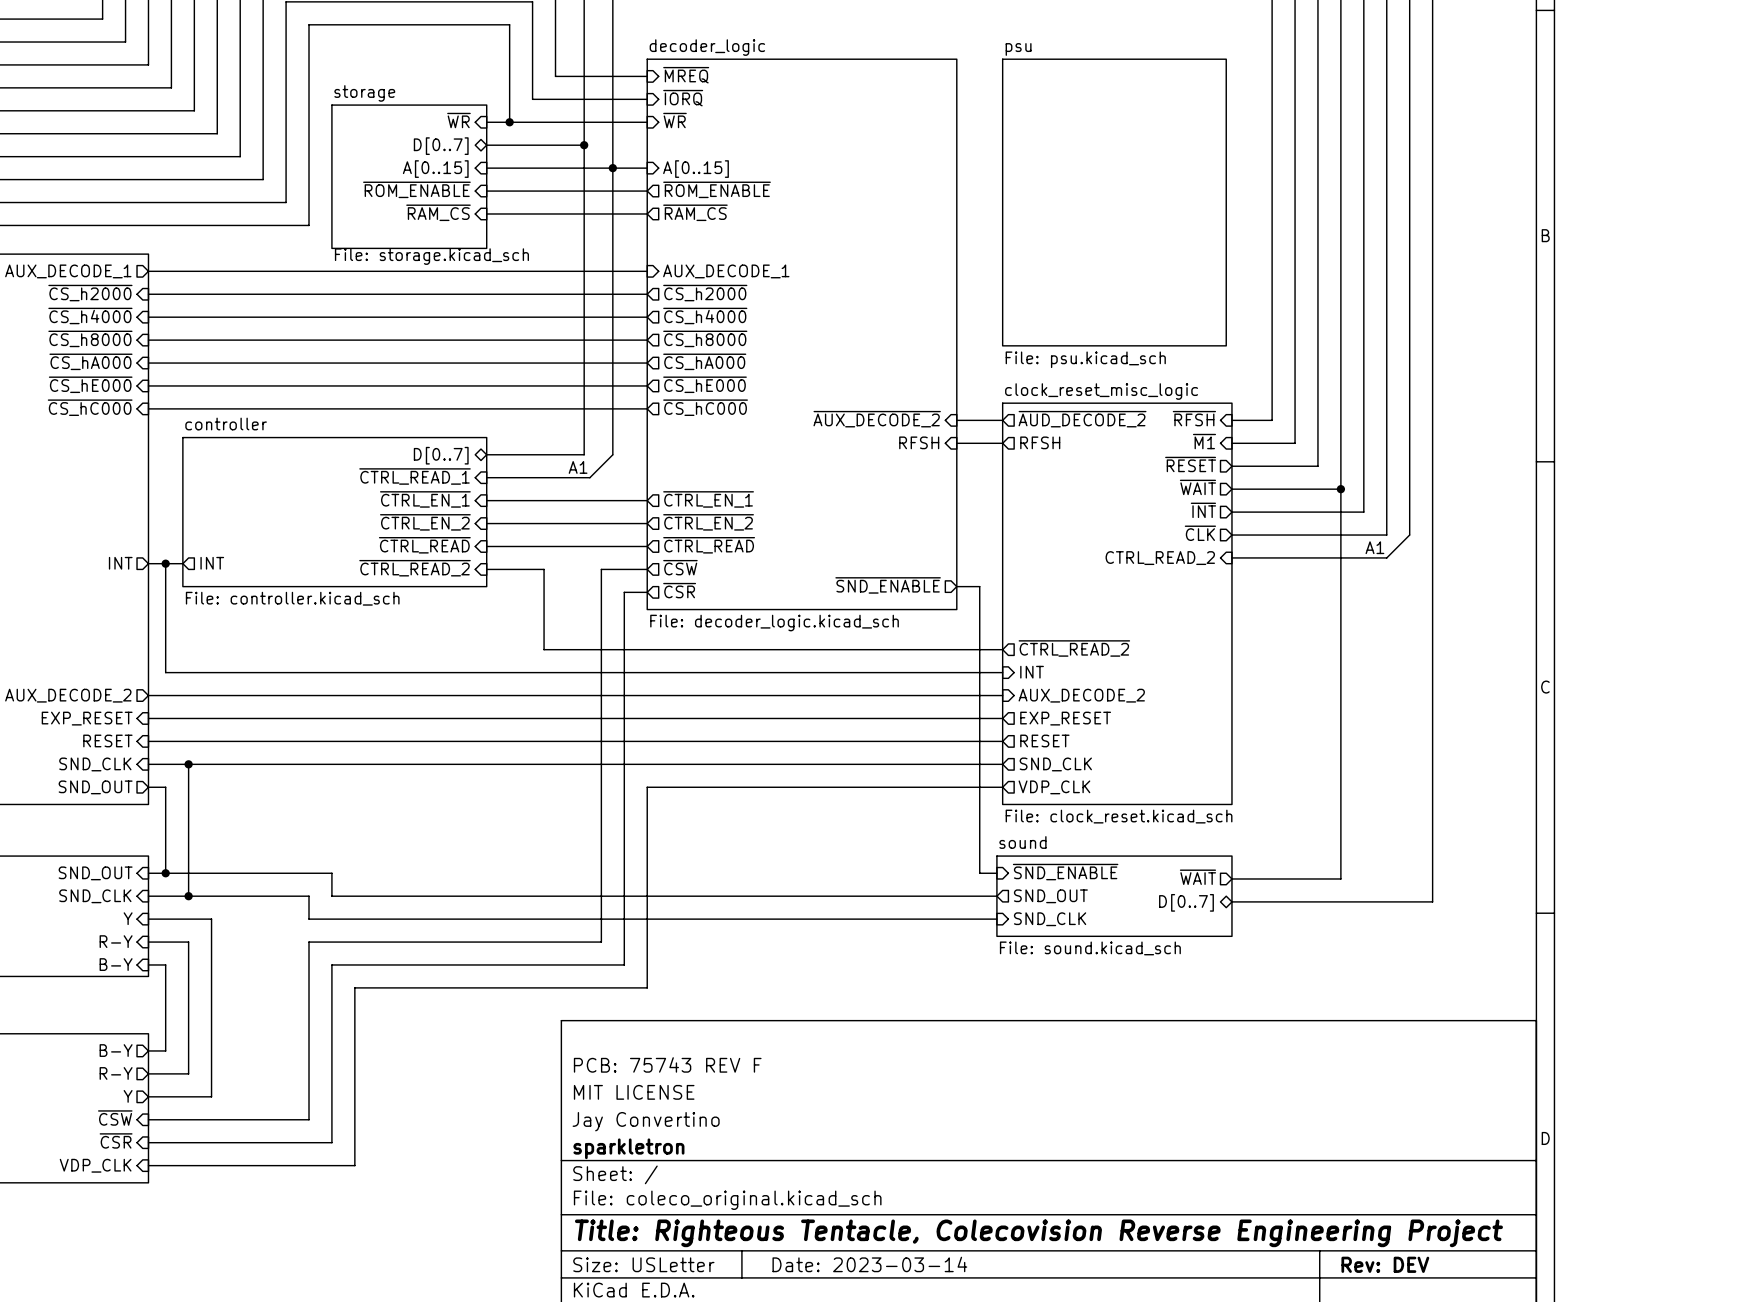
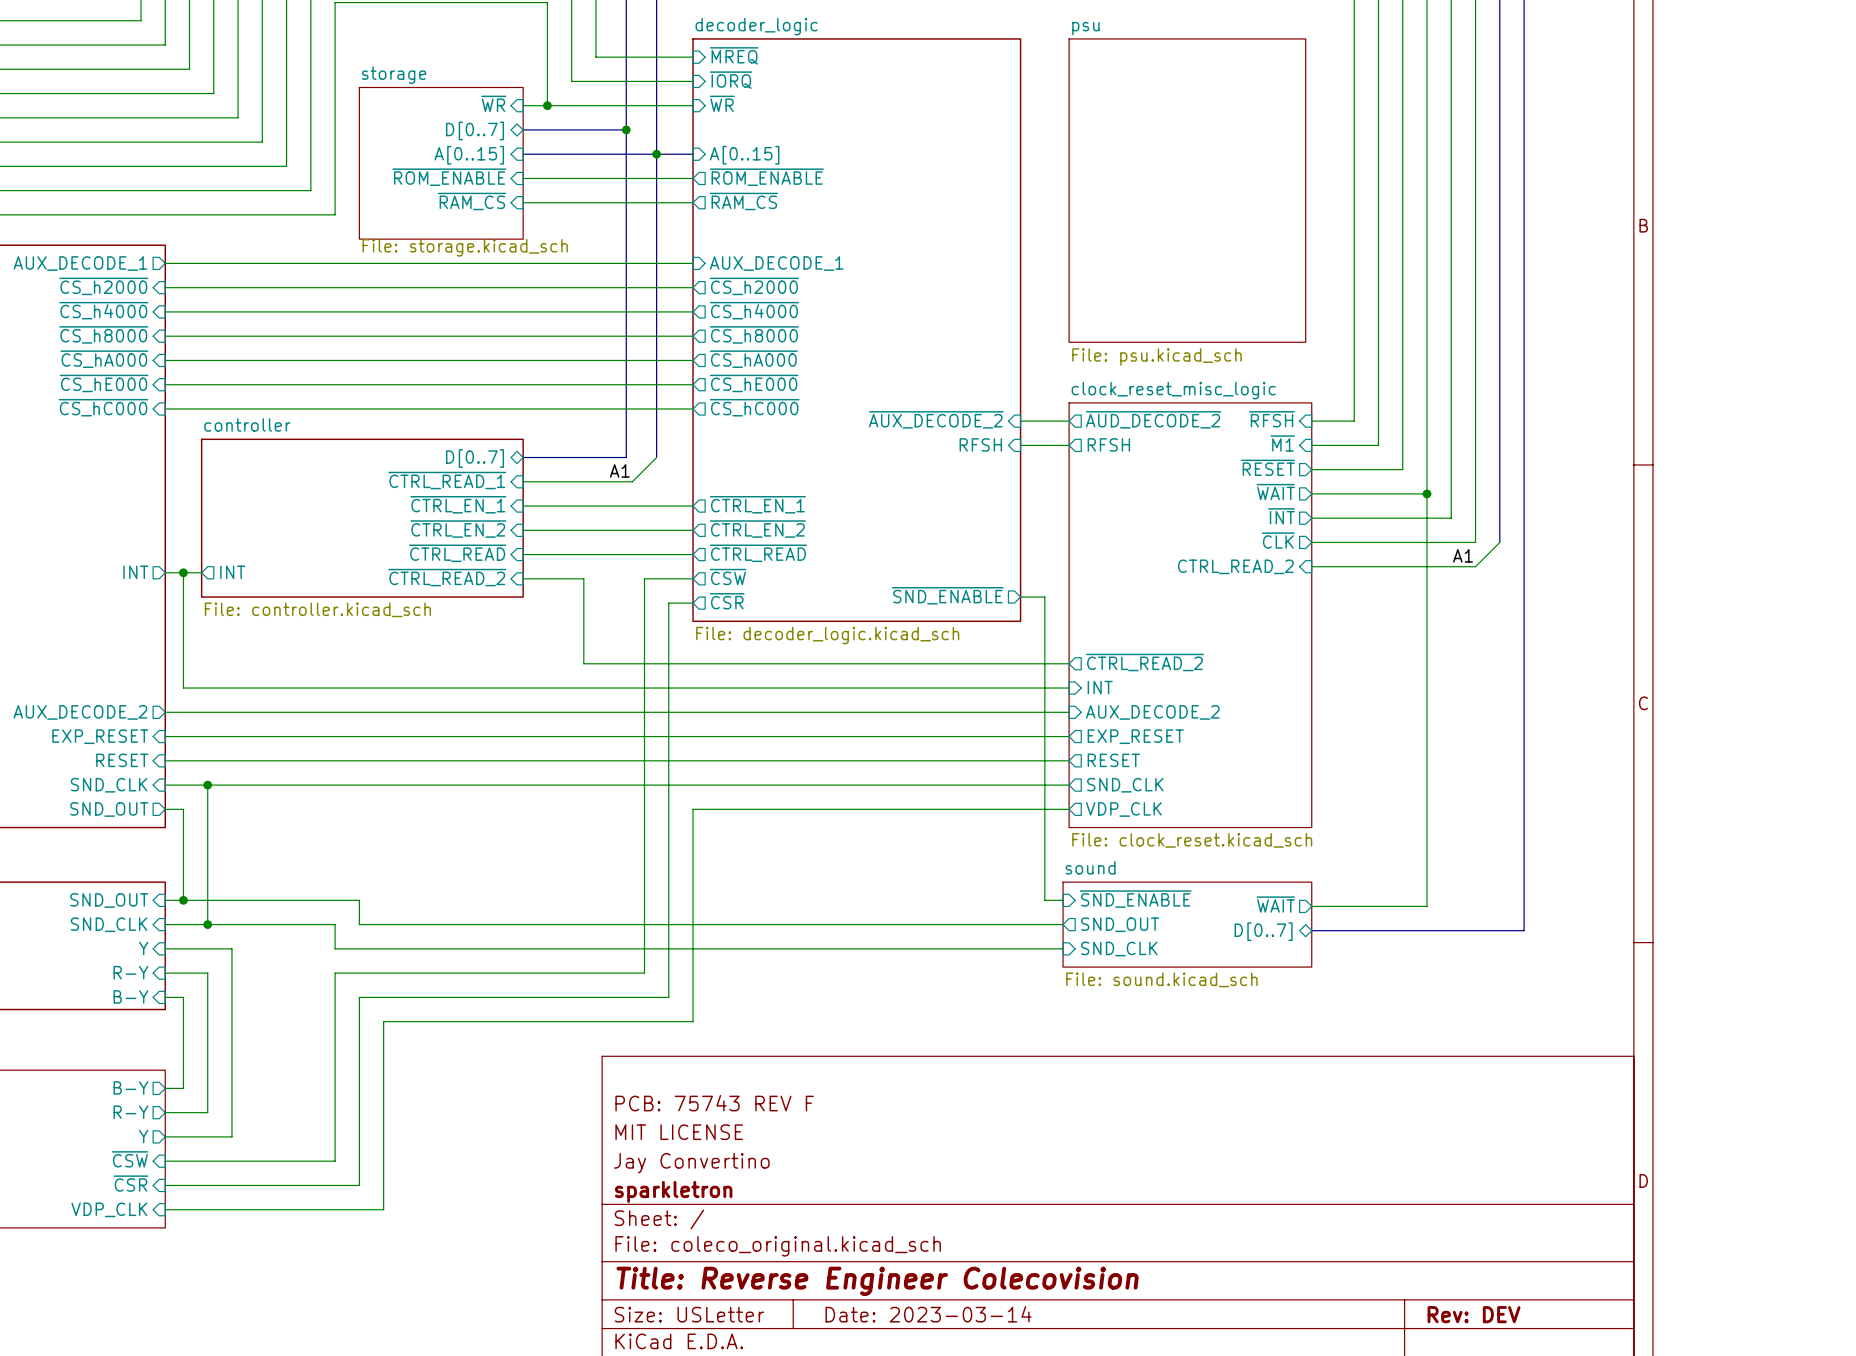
title block: Title: Righteous Tentacle, Colecovision Reverse Engineering Project (1038, 1233) -> Title: Reverse Engineer Colecovision (877, 1281)

